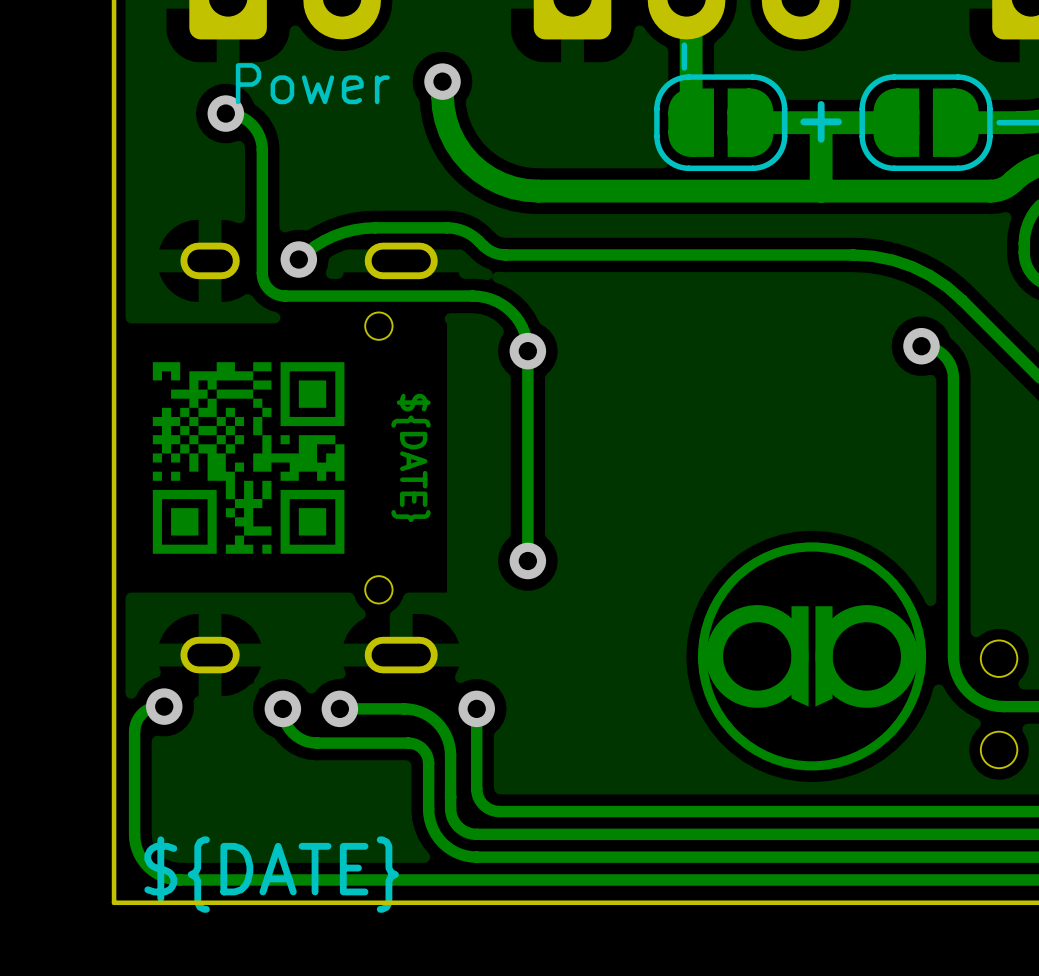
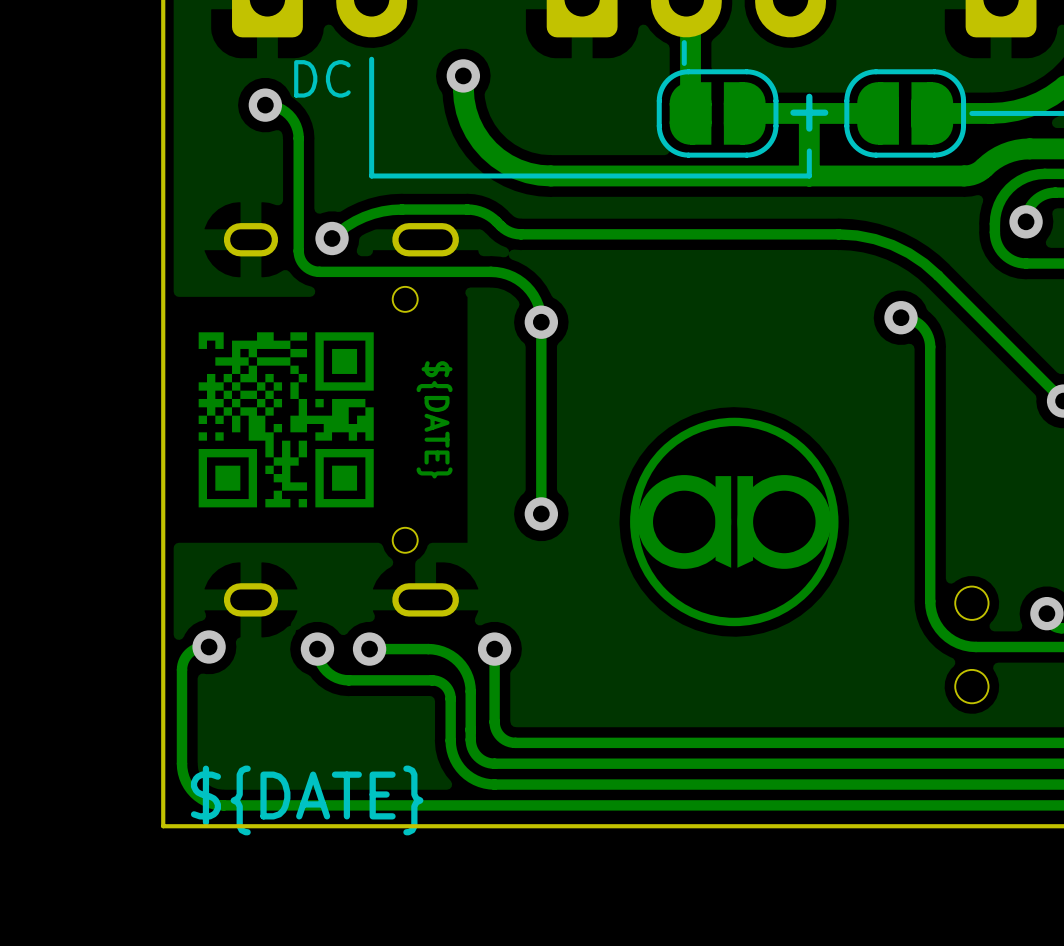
line: none -> (371, 59) (371, 175) (809, 175) (809, 150)
text: Power (312, 83) -> DC (322, 78)
drawing position: (812, 656) -> (734, 521)

